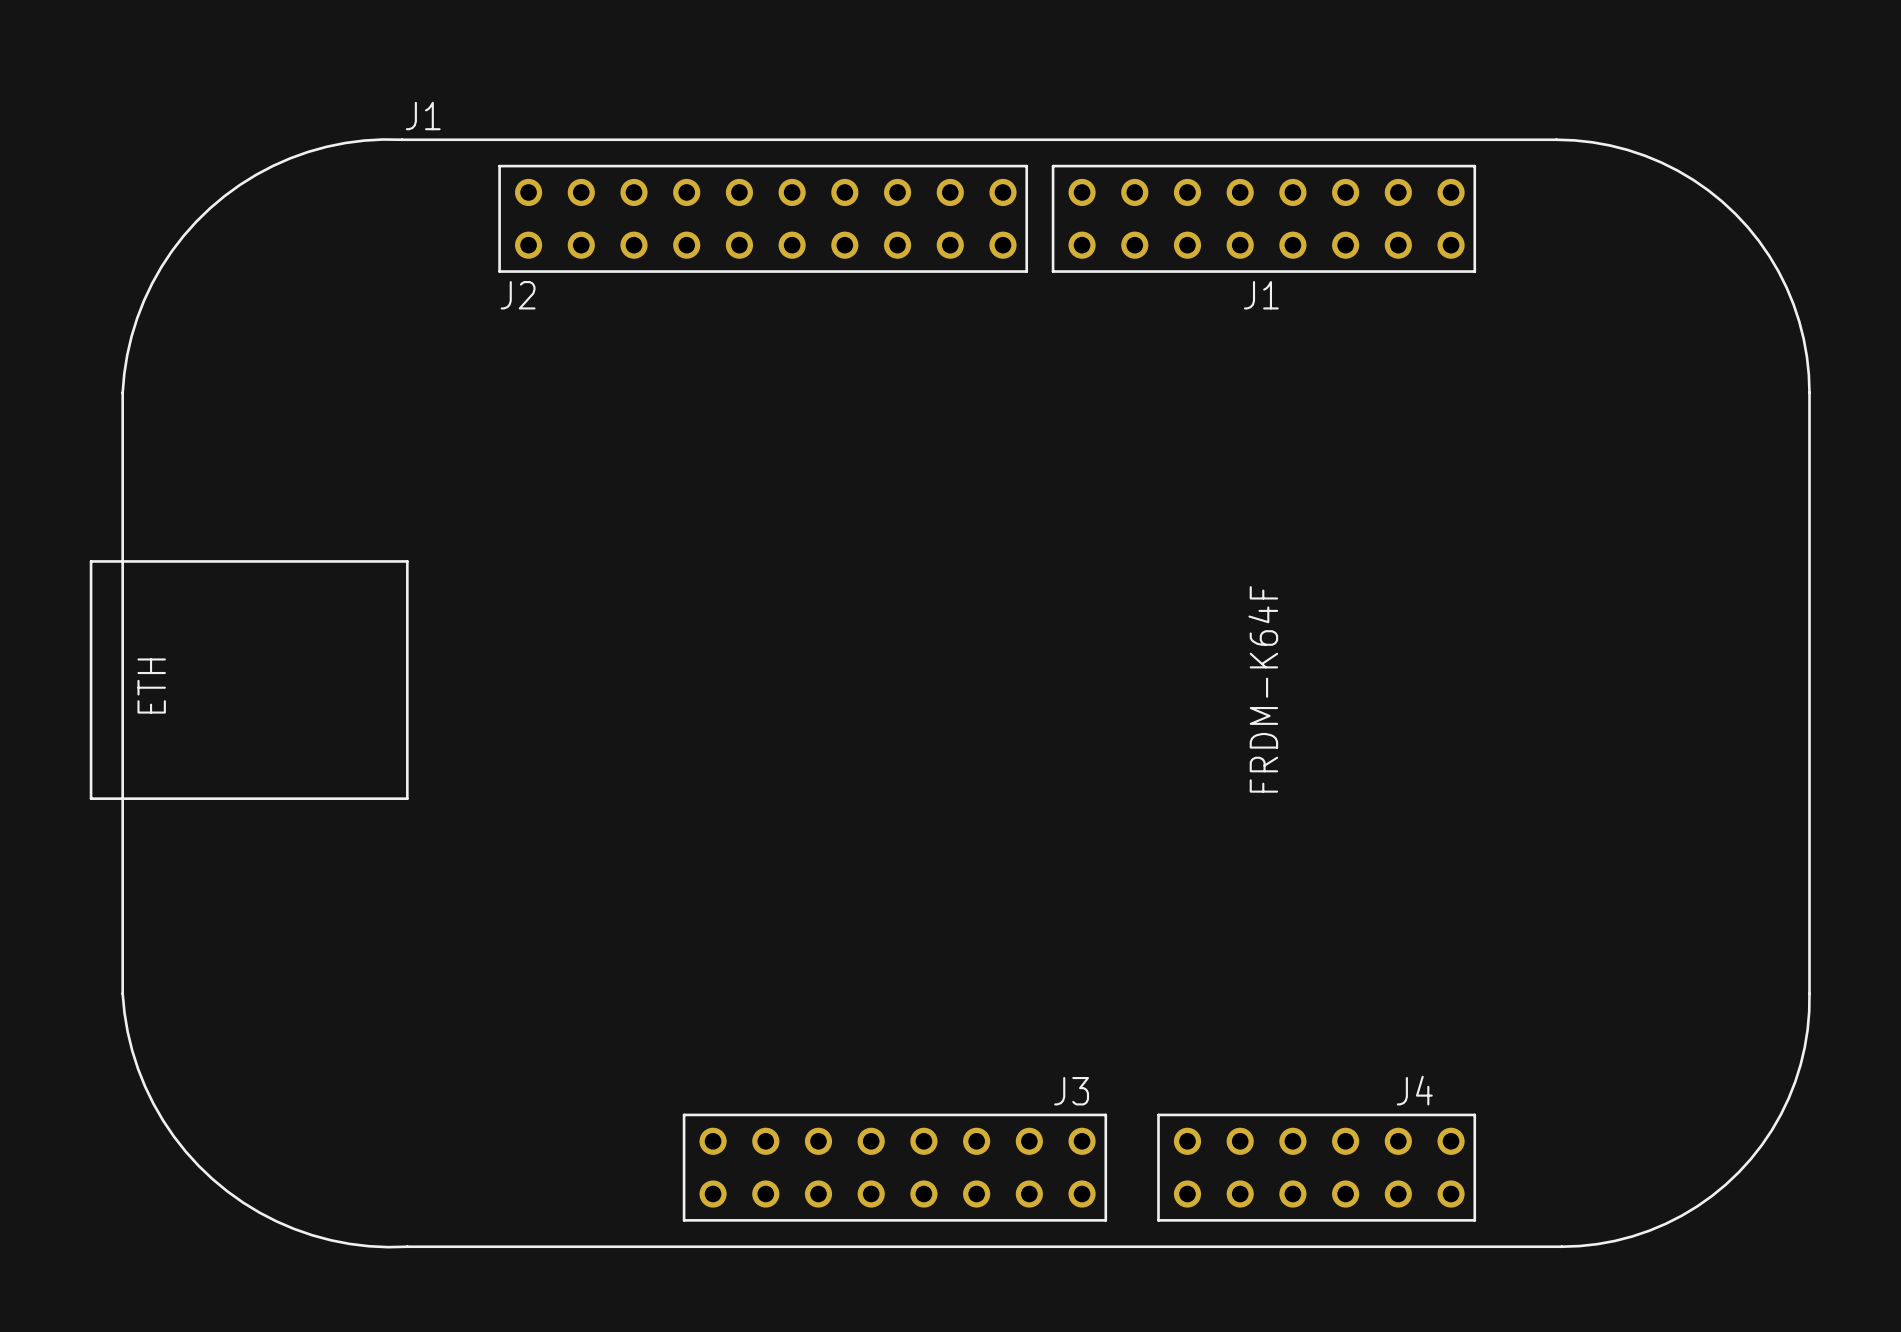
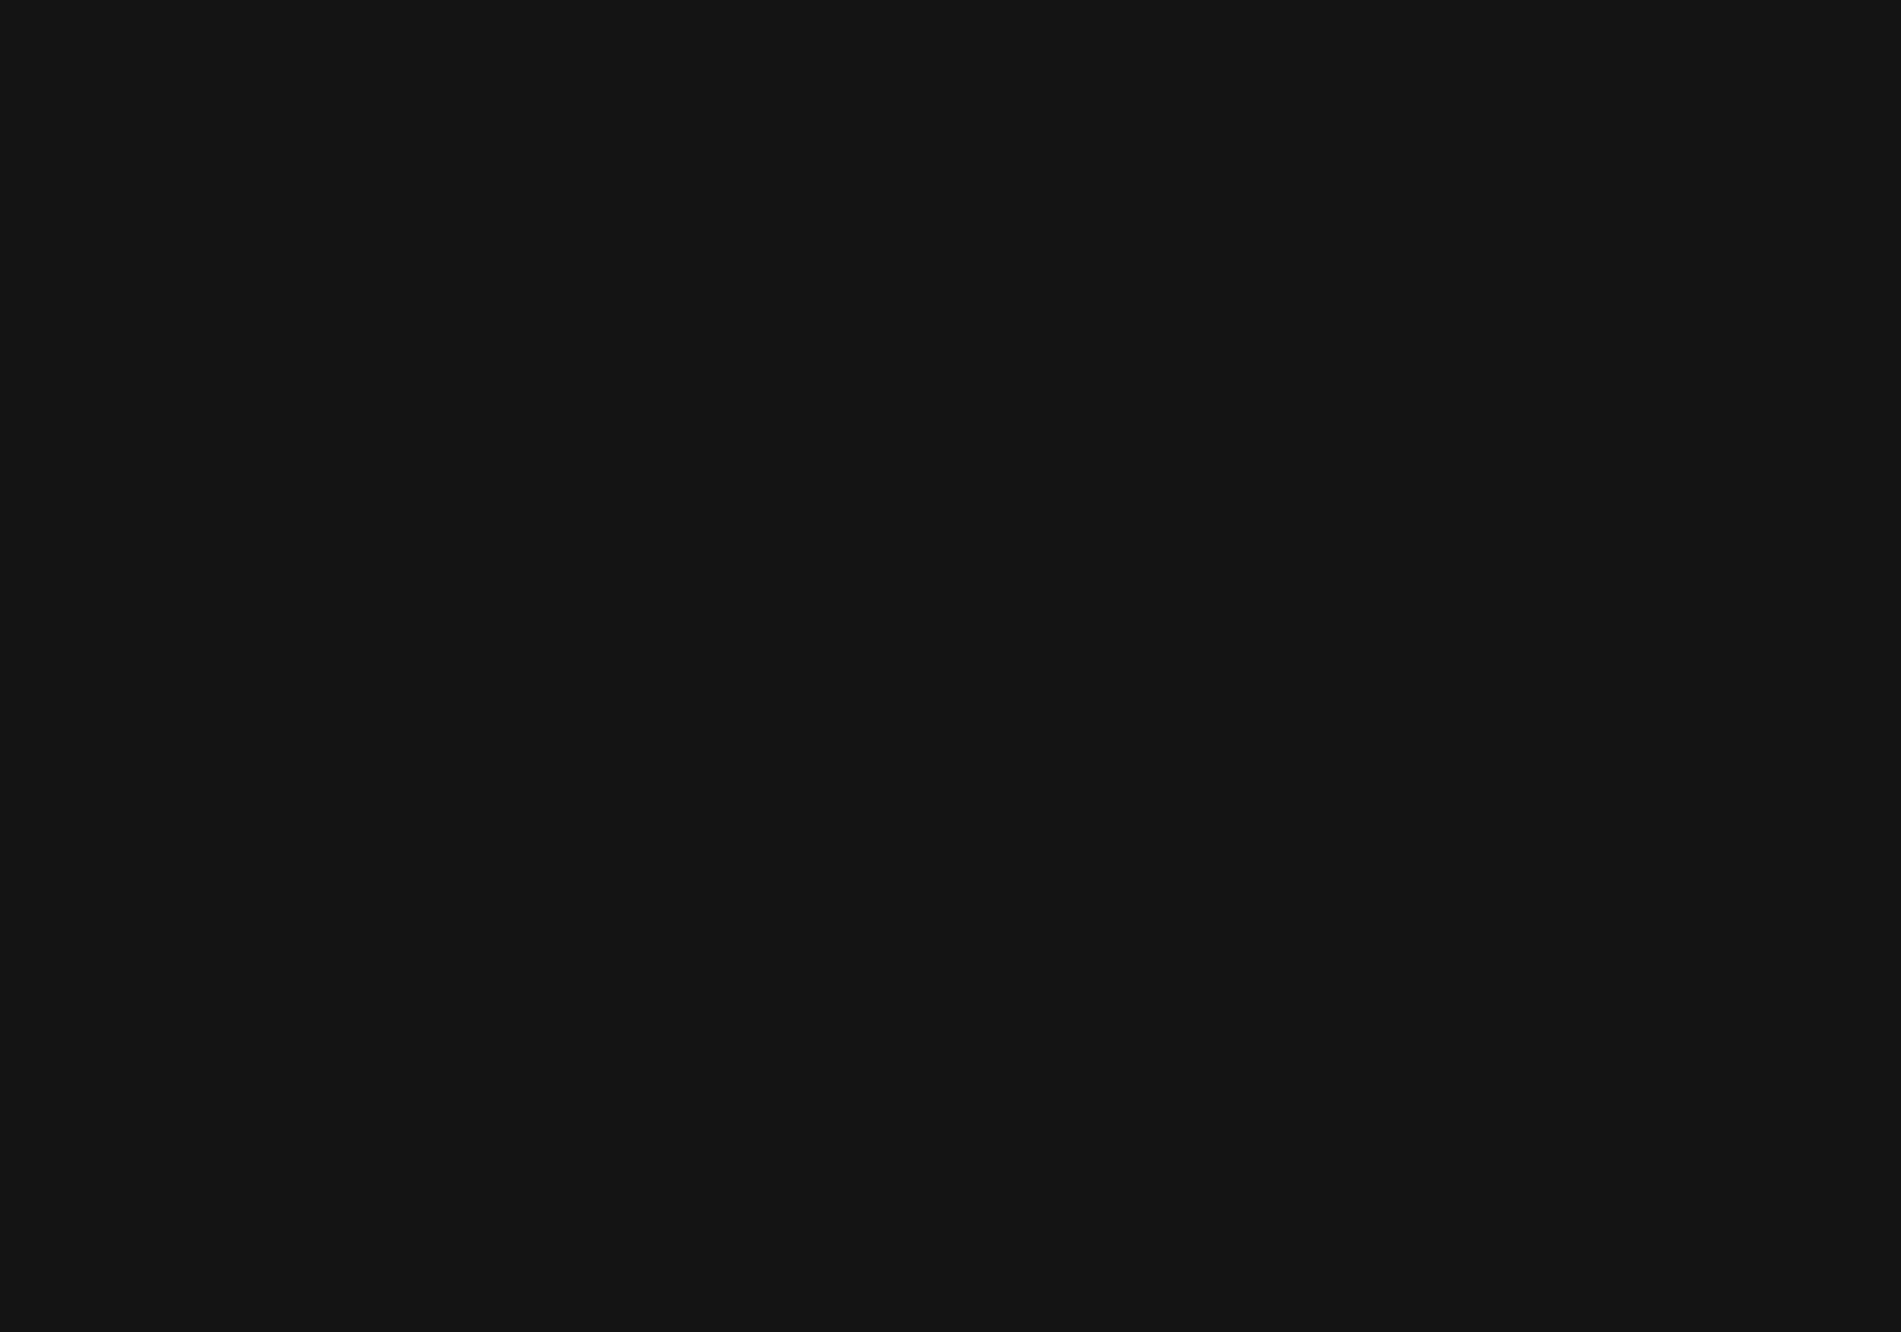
J1: (950, 693) -> none

